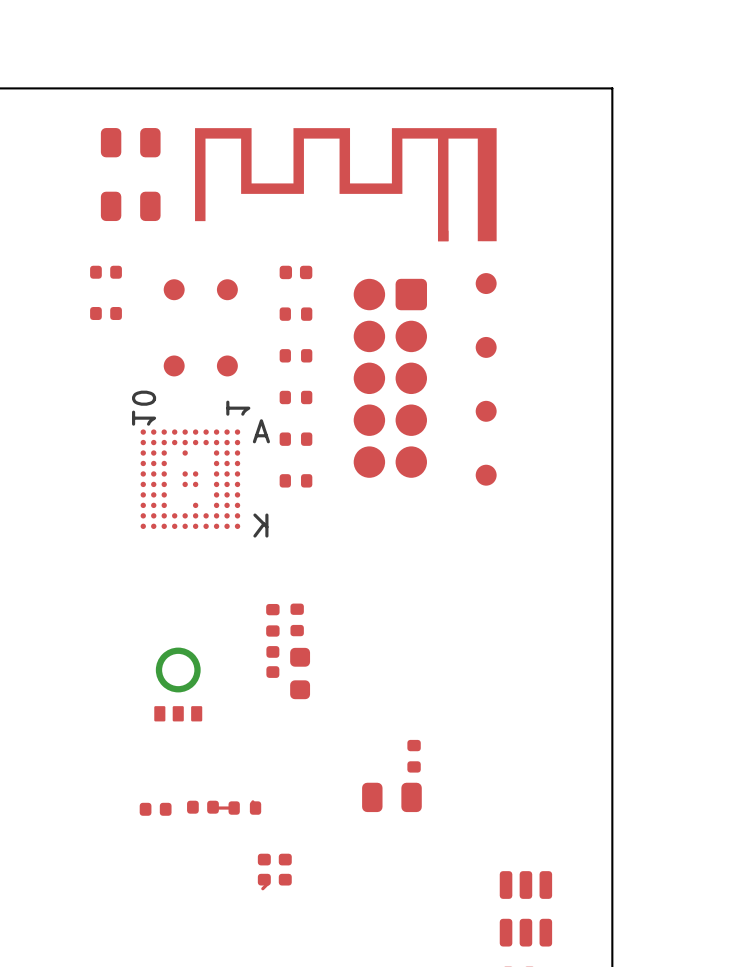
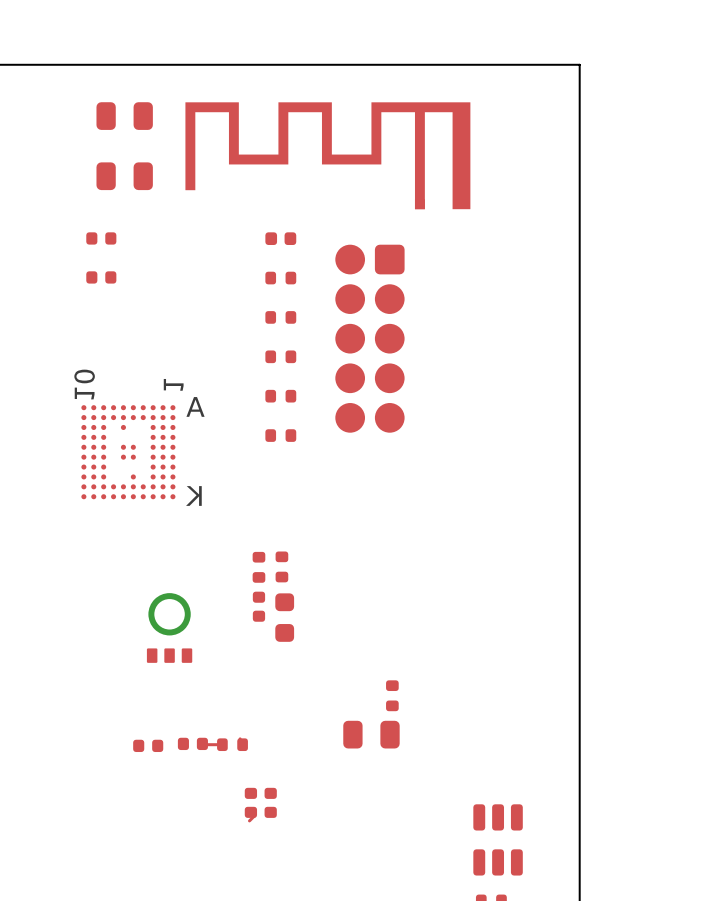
part: (486, 283) -> none
part: (200, 289) -> none
part: (486, 347) -> none
part: (200, 365) -> none
part: (486, 411) -> none
part: (486, 475) -> none
part position: (190, 479) -> (128, 452)

